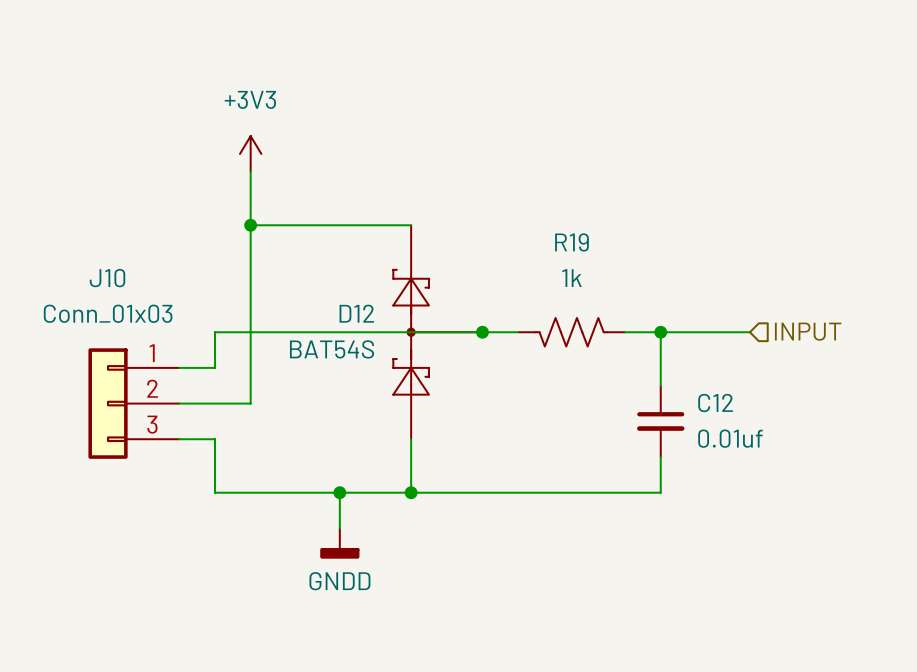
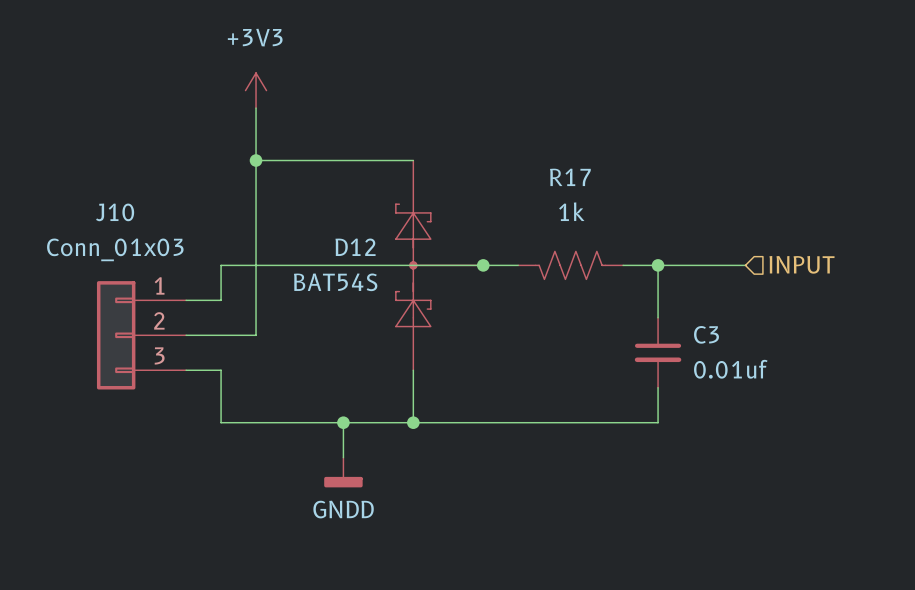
R19 name: R19 (571, 242) -> R17 (570, 177)
C12 name: C12 (715, 403) -> C3 (706, 334)

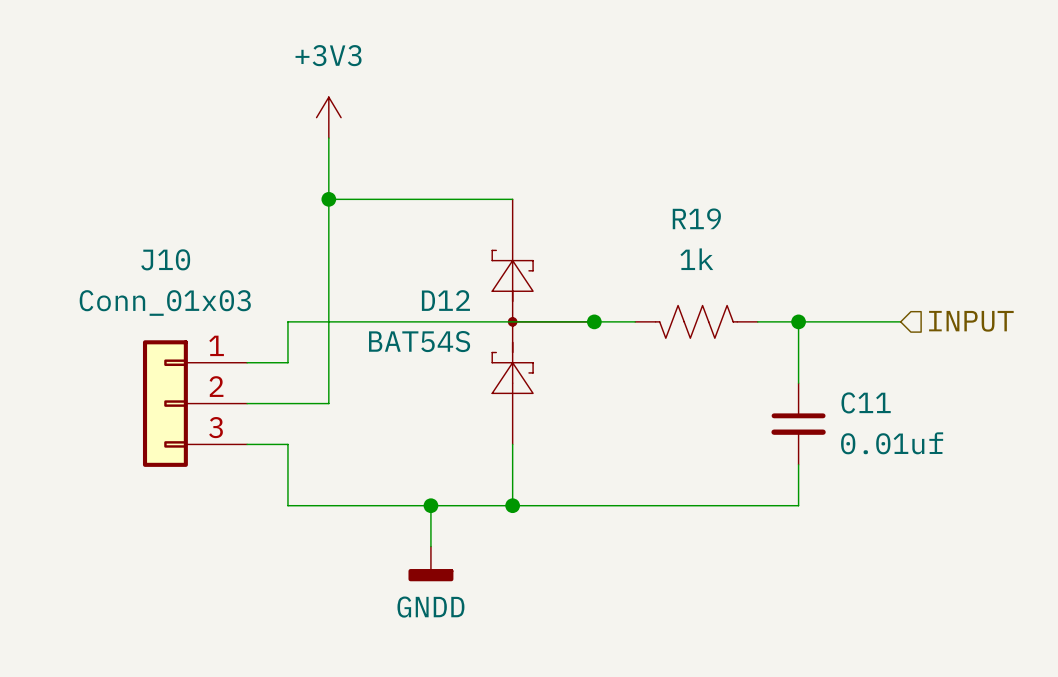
R17 name: R17 (570, 177) -> R19 (696, 218)
C3 name: C3 (706, 334) -> C11 (866, 402)

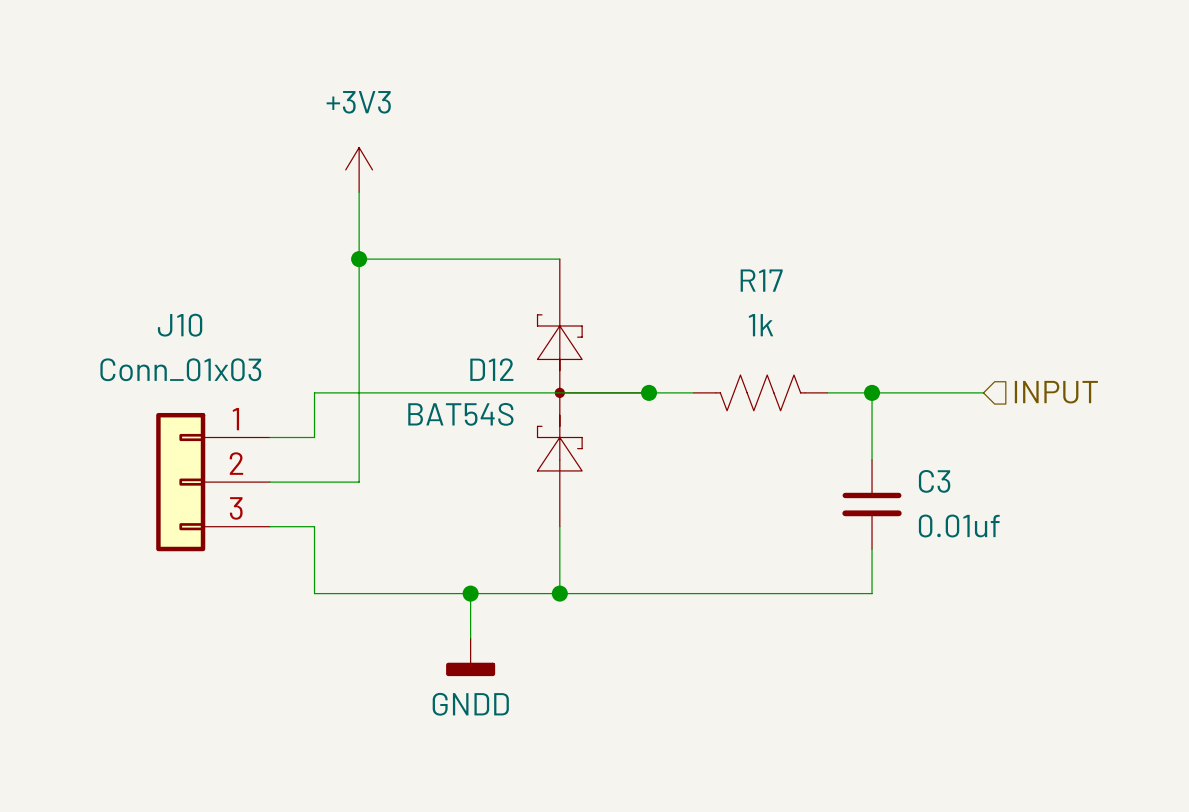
R19 name: R19 (696, 218) -> R17 (761, 280)
C11 name: C11 (866, 402) -> C3 (934, 481)

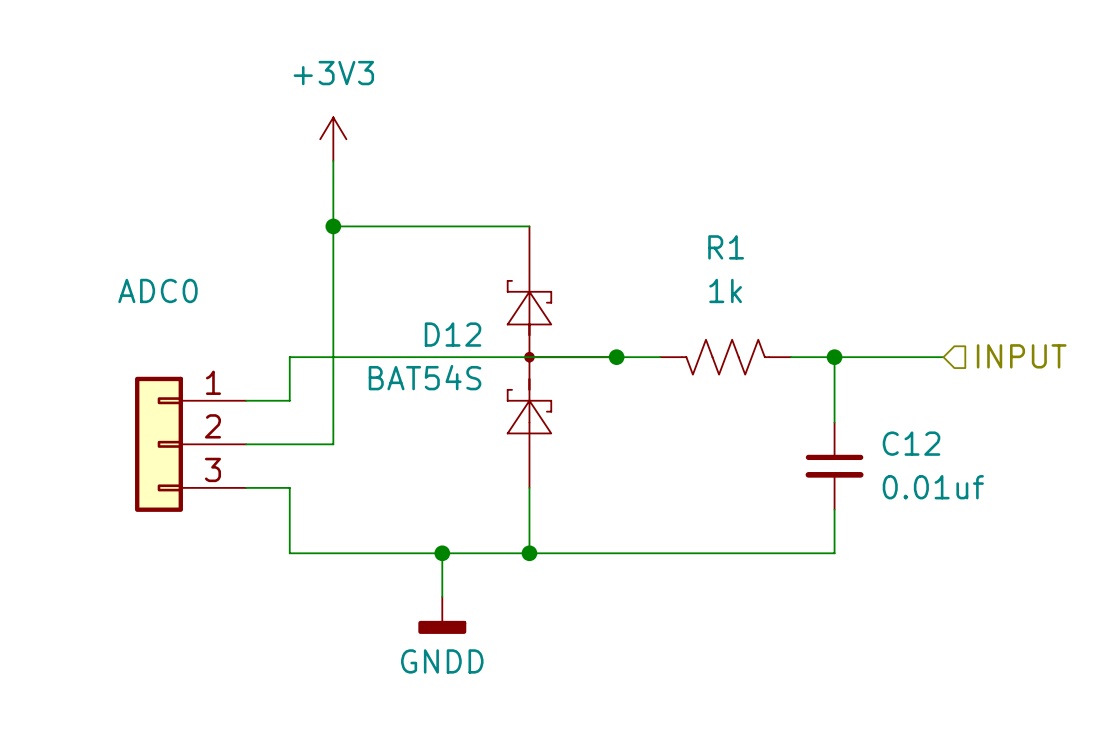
R17 name: R17 (761, 280) -> R1 (726, 247)
J10 name: J10 (180, 325) -> ADC0 (157, 290)
J10 value: Conn_01x03 (180, 369) -> none
C3 name: C3 (934, 481) -> C12 (911, 443)

